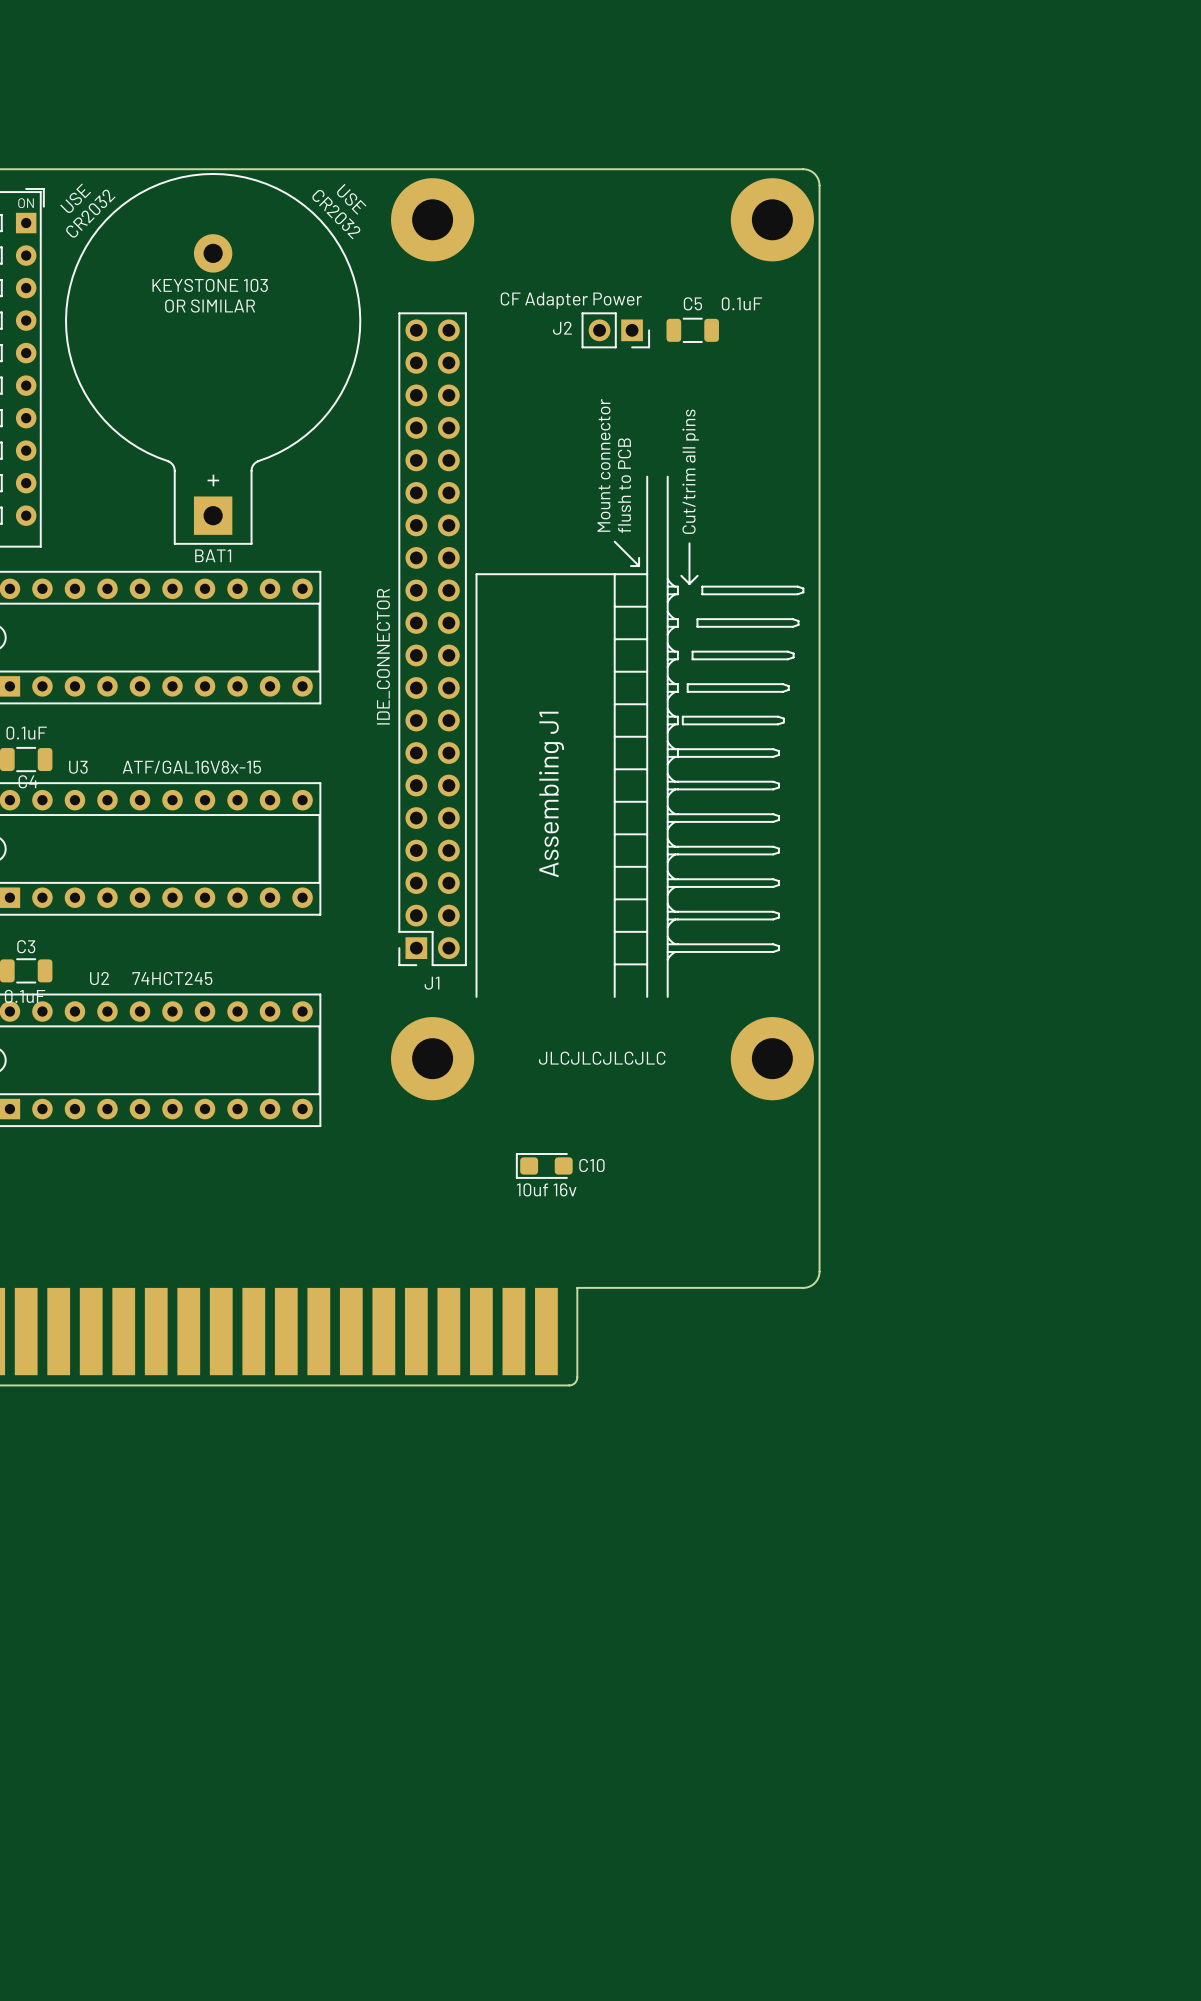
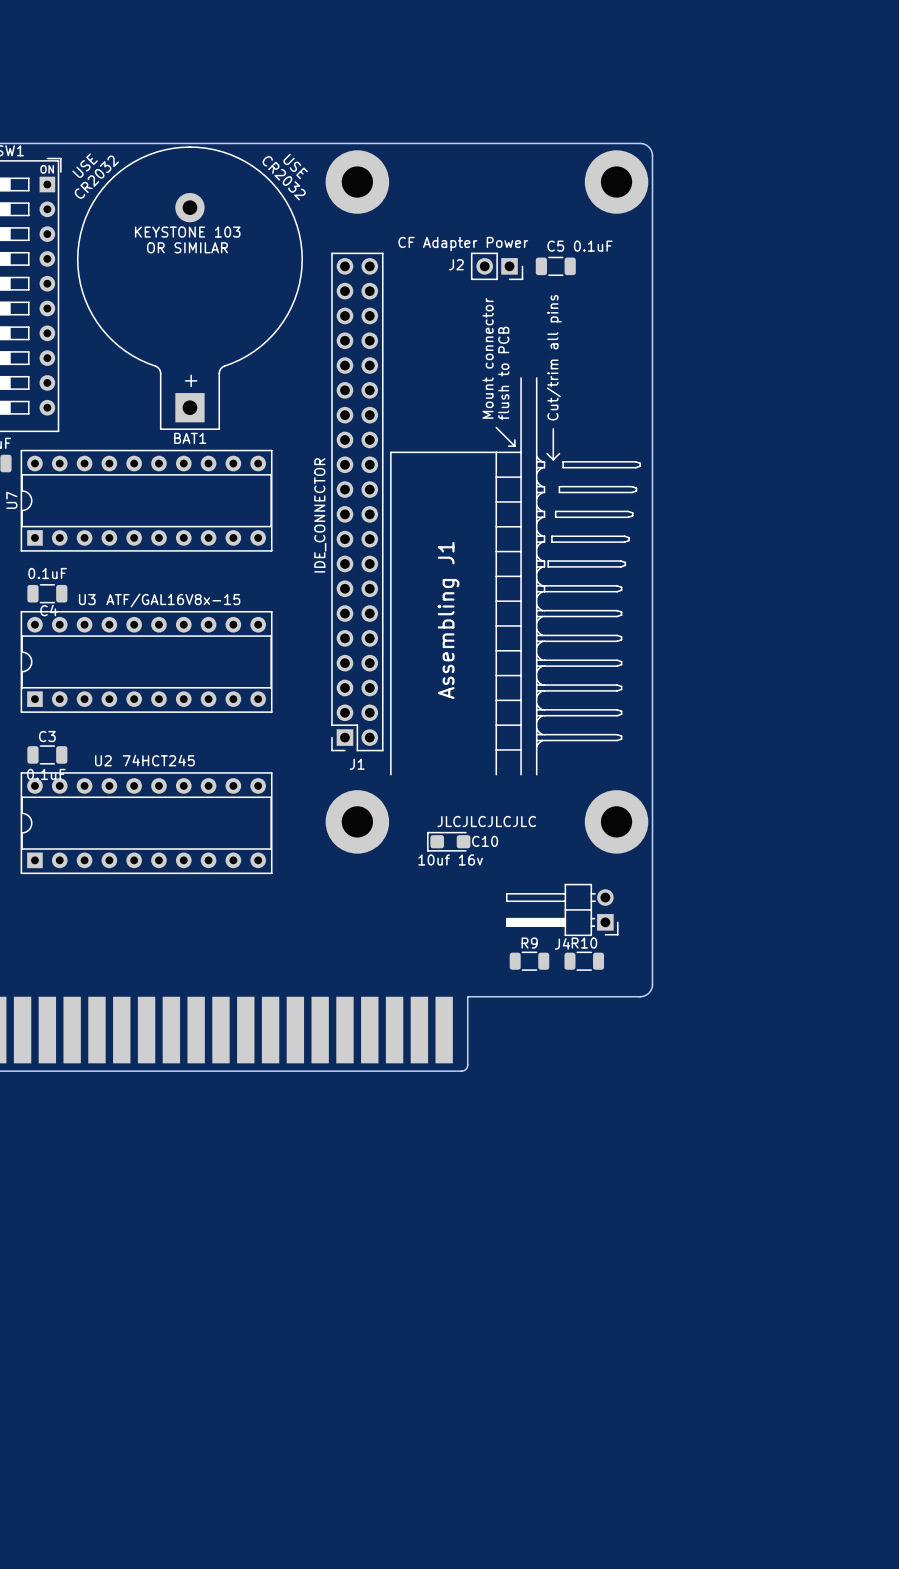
C10 position: (544, 1165) -> (448, 841)
J4: none -> (562, 909)
R9: none -> (529, 961)
R10: none -> (584, 961)

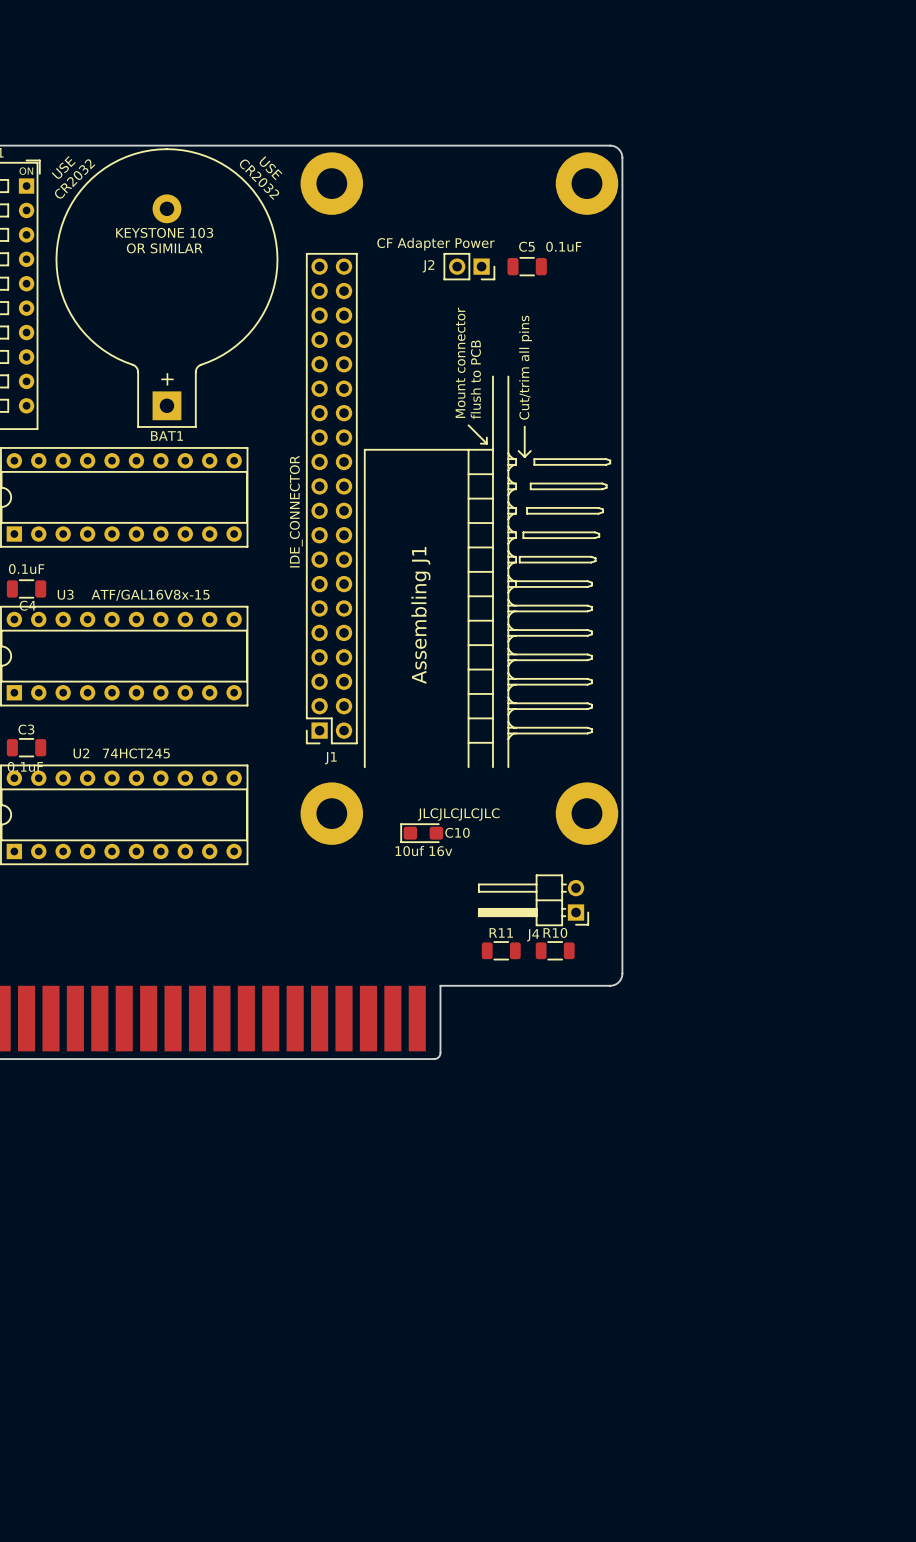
R9 name: R9 (529, 943) -> R11 (501, 932)

